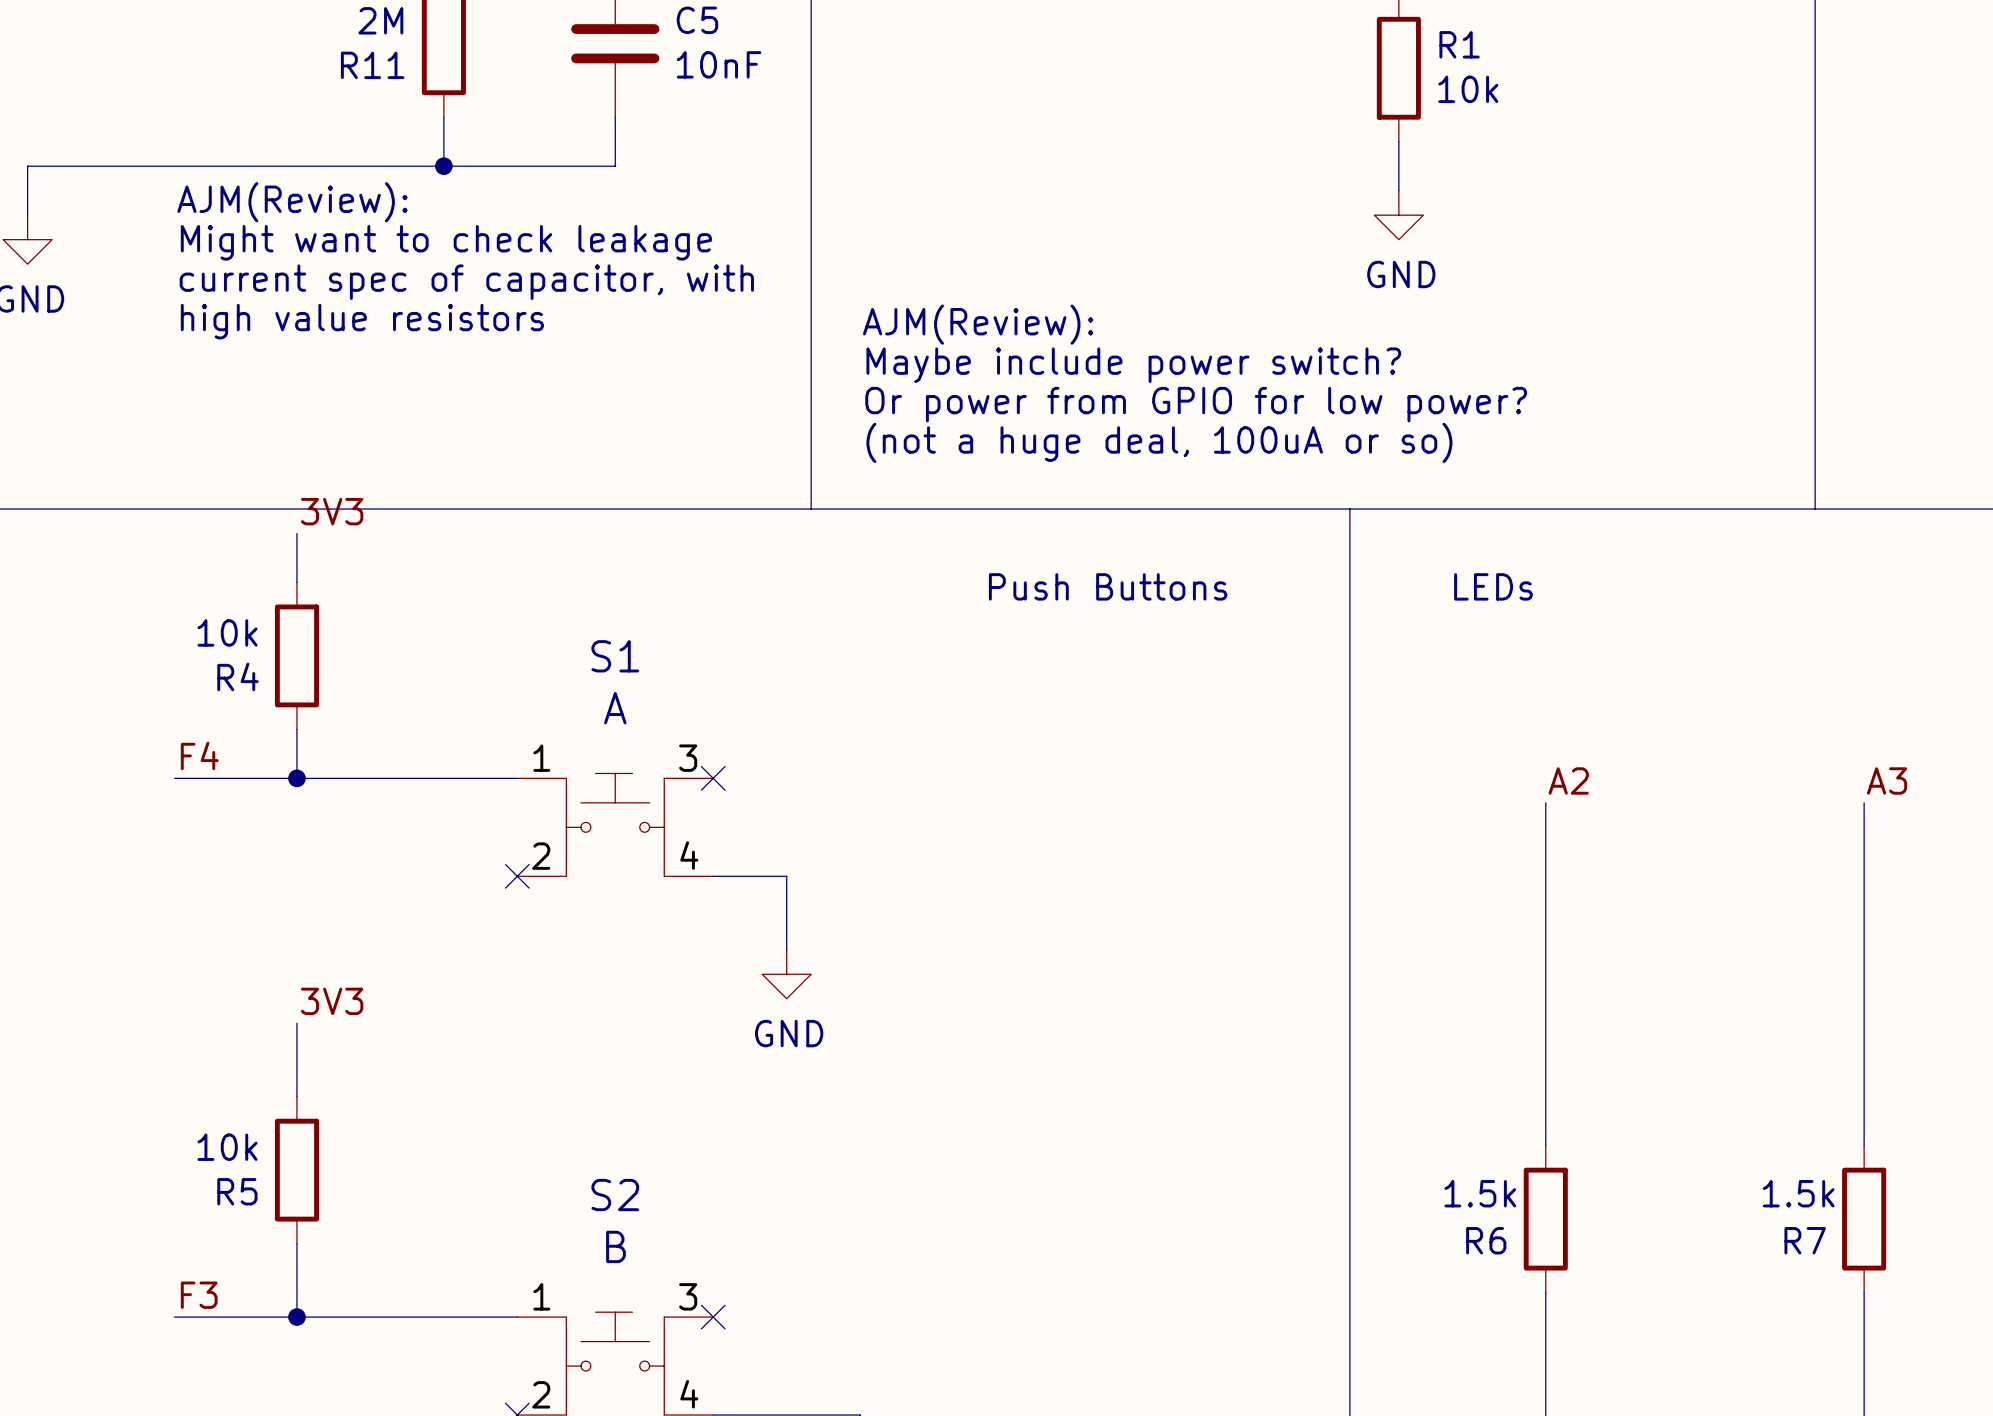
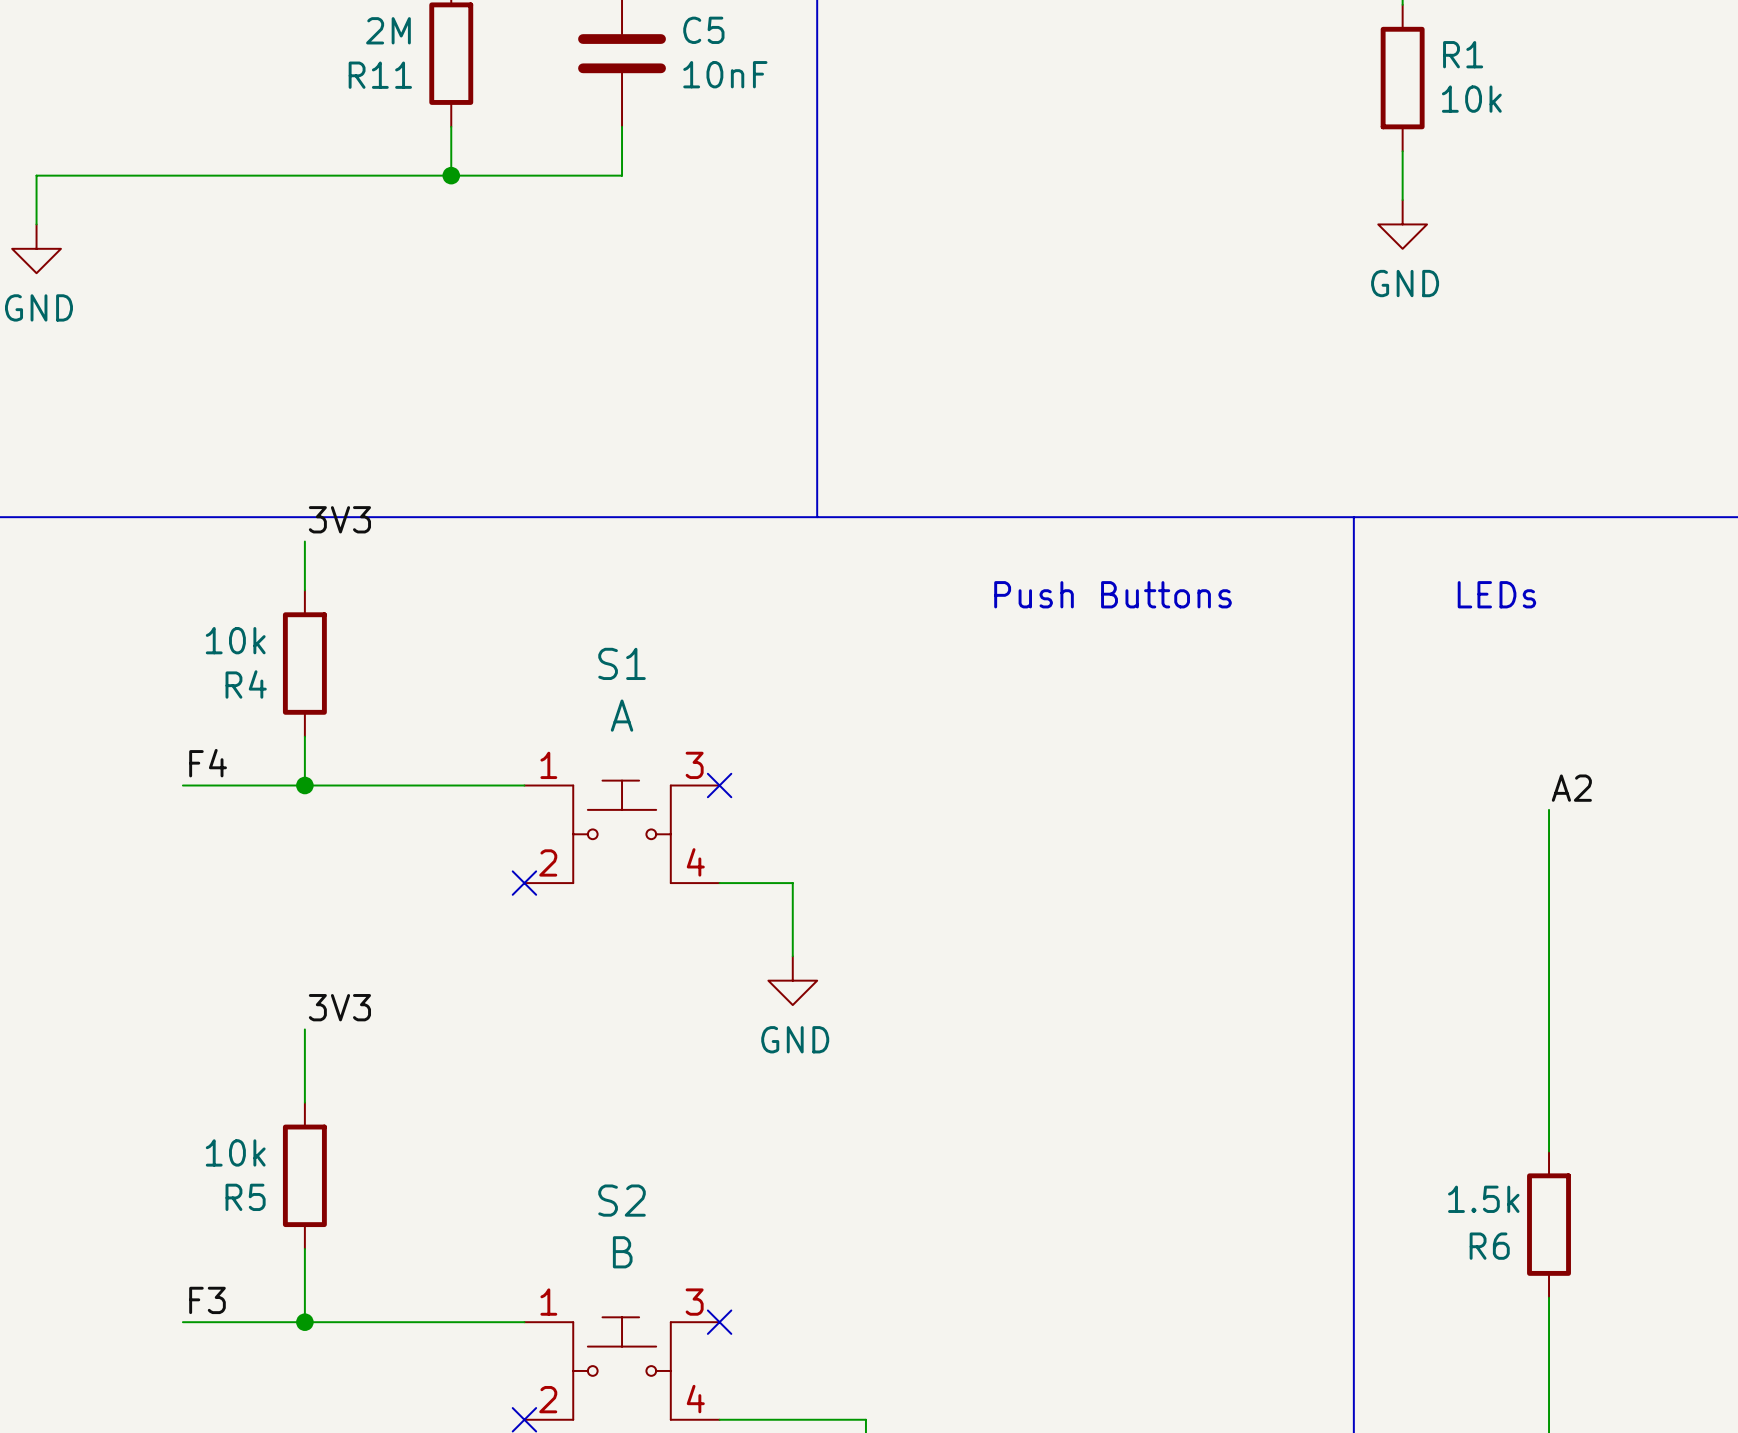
text: AJM(Review): (292, 202) -> none
text: Might want to check leakage (446, 242) -> none
text: current spec of capacitor, with (466, 282) -> none
text: high value resistors (362, 321) -> none
text: AJM(Review): (978, 324) -> none
text: Maybe include power switch? (1133, 365) -> none
text: Or power from GPIO for low power? (1196, 404) -> none
text: (not a huge deal, 100uA or so) (1159, 442) -> none

